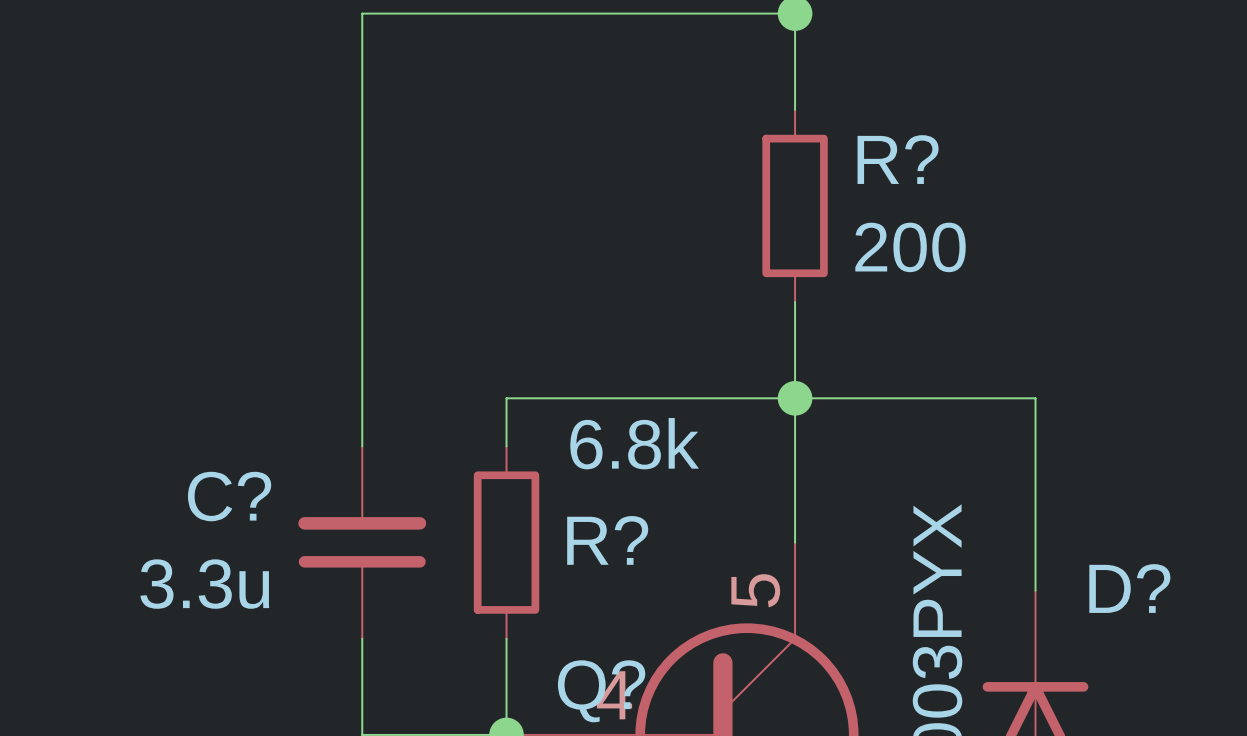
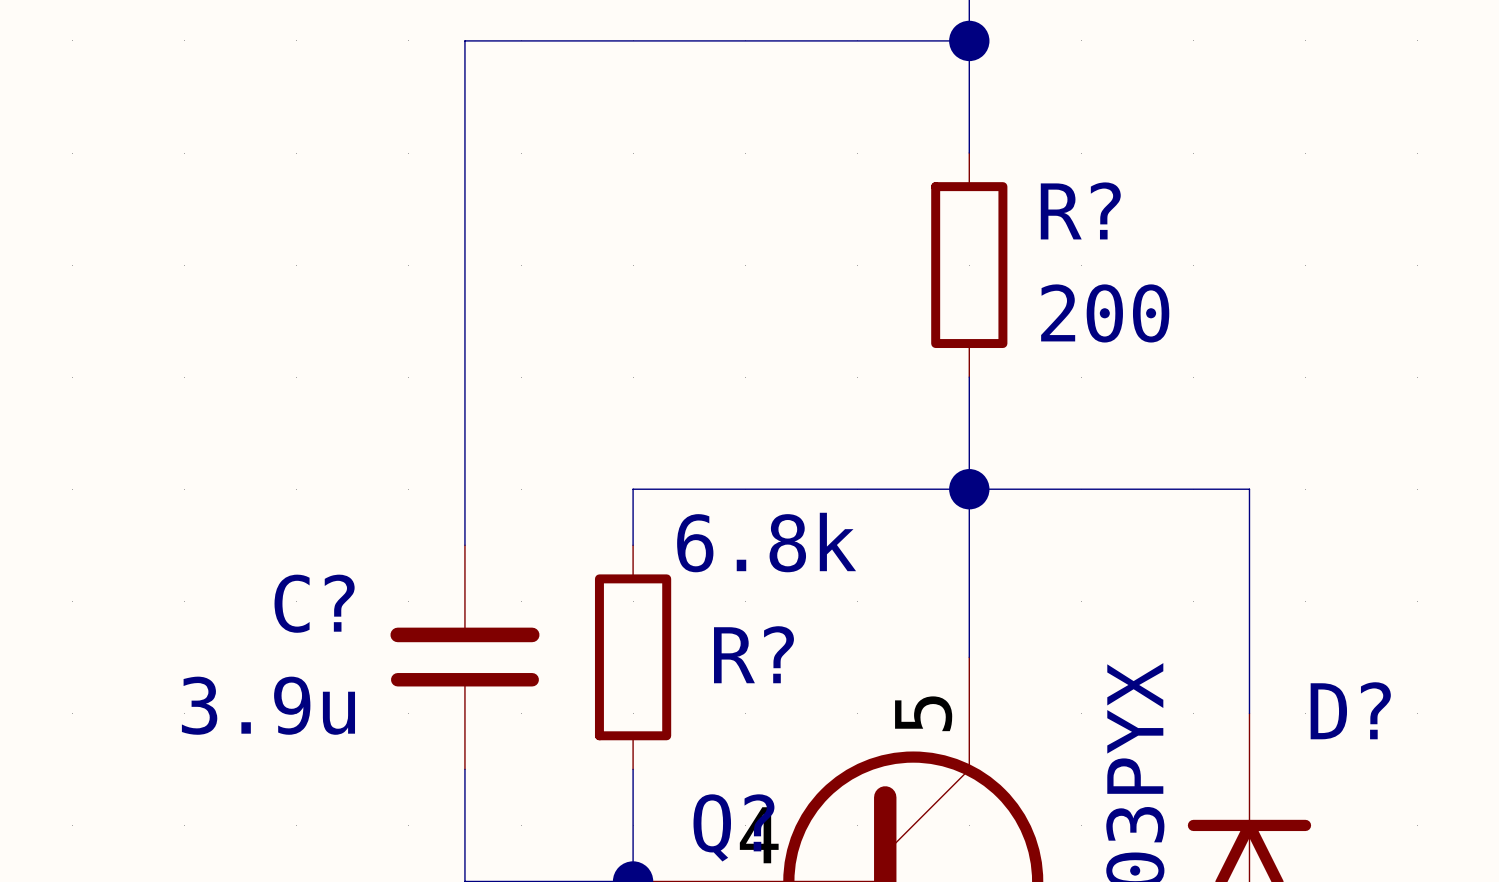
C? value: 3.3u (204, 584) -> 3.9u (268, 705)

